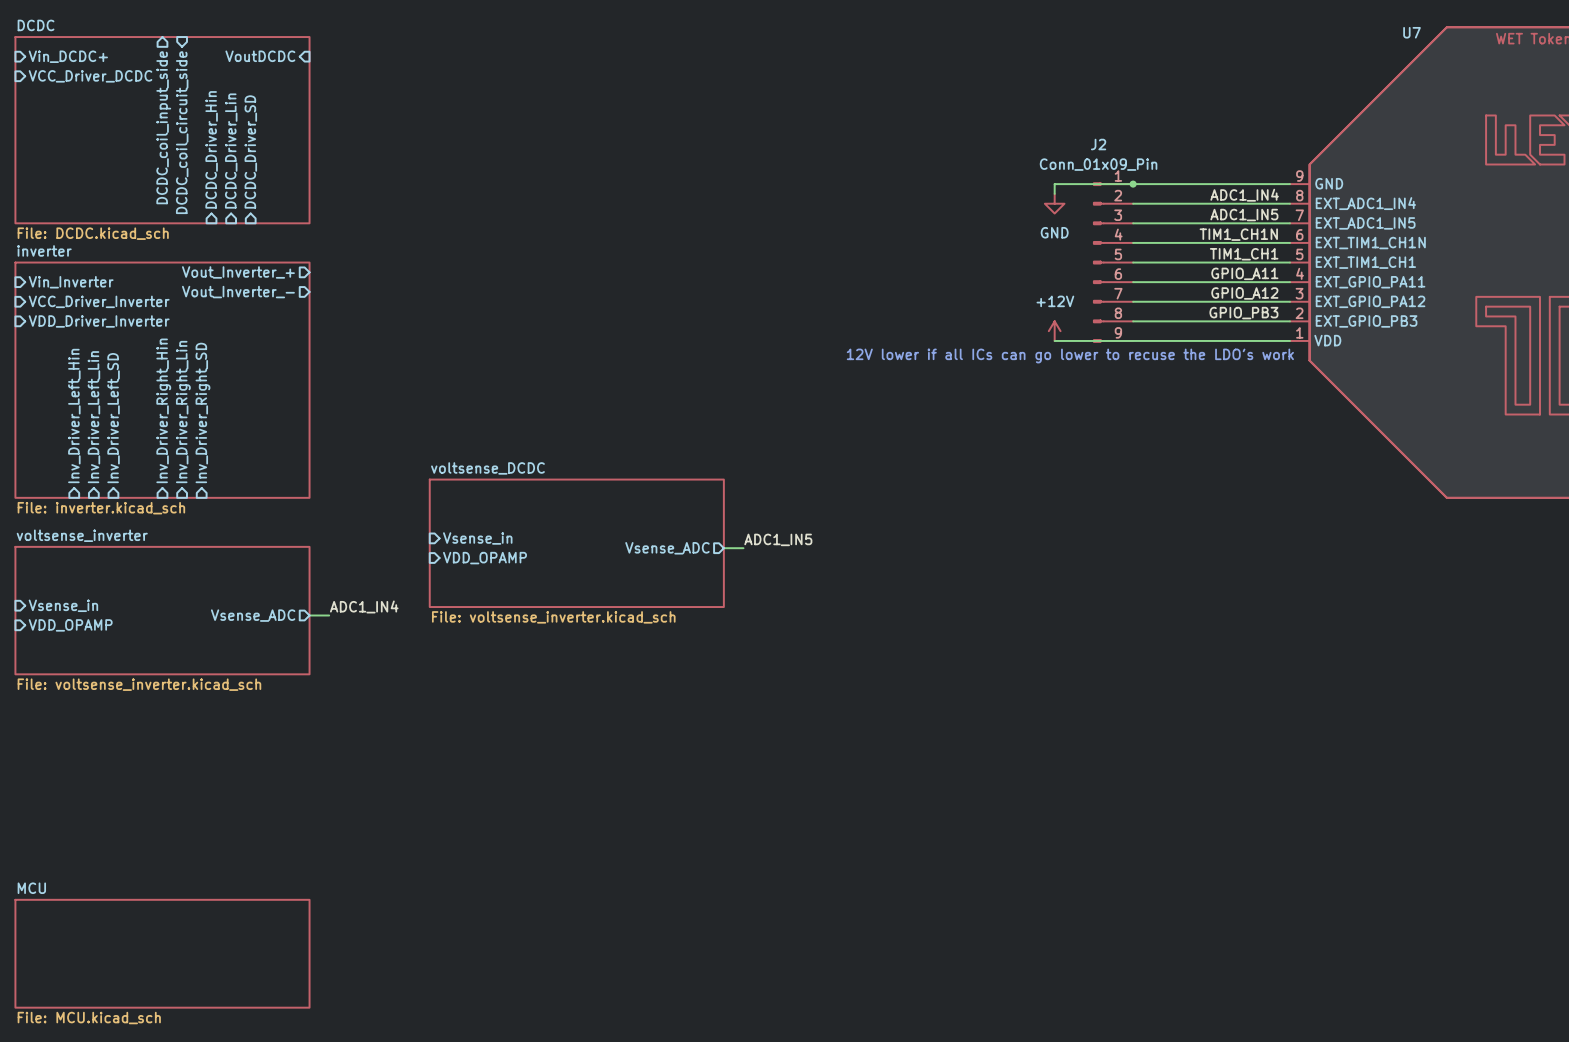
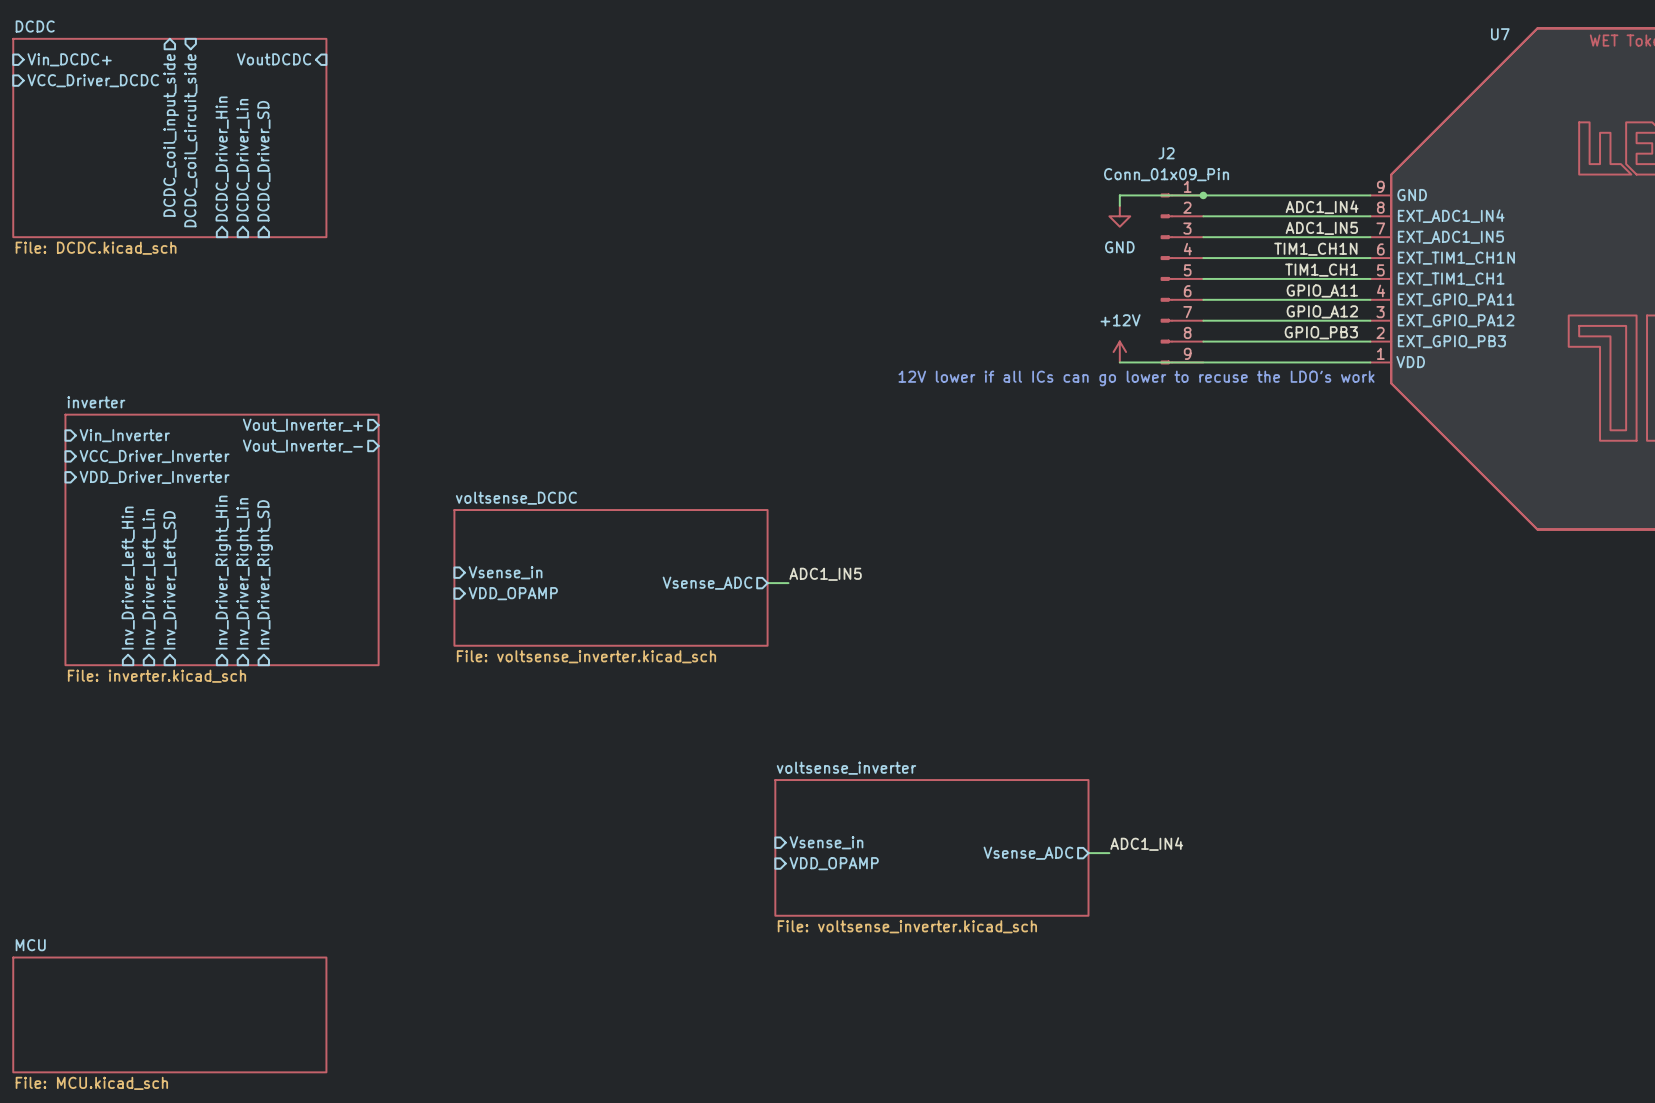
sheet pin position: Vout_Inverter_+ (238, 272) -> Vout_Inverter_+ (302, 425)
sheet pin position: Vin_Inverter (71, 282) -> Vin_Inverter (124, 435)
sheet pin position: Vout_Inverter_- (238, 292) -> Vout_Inverter_- (302, 446)
sheet pin position: VCC_Driver_Inverter (99, 301) -> VCC_Driver_Inverter (154, 456)
sheet pin position: VDD_Driver_Inverter (99, 321) -> VDD_Driver_Inverter (154, 477)
sheet inverter position: (162, 380) -> (222, 539)
sheet pin position: Inv_Driver_Right_Hin (163, 410) -> Inv_Driver_Right_Hin (223, 572)
sheet pin position: Inv_Driver_Right_Lin (183, 412) -> Inv_Driver_Right_Lin (244, 573)
sheet pin position: Inv_Driver_Right_SD (202, 412) -> Inv_Driver_Right_SD (265, 574)
sheet pin position: Inv_Driver_Left_Hin (74, 415) -> Inv_Driver_Left_Hin (128, 578)
sheet pin position: Inv_Driver_Left_Lin (93, 417) -> Inv_Driver_Left_Lin (149, 579)
sheet pin position: Inv_Driver_Left_SD (113, 418) -> Inv_Driver_Left_SD (169, 580)
sheet pin: Vsense_in (63, 605) -> none
label: ADC1_IN4 (364, 606) -> none
sheet voltsense_inverter: File: voltsense_inverter.kicad_sch (162, 610) -> none
sheet pin: Vsense_ADC (253, 615) -> none
wire: (309, 615) (329, 615) -> none
sheet pin: VDD_OPAMP (70, 625) -> none
sheet pin: none -> Vsense_in (826, 842)
label: none -> ADC1_IN4 (1146, 844)
sheet voltsense_inverter: none -> File: voltsense_inverter.kicad_sch (931, 847)
sheet pin: none -> Vsense_ADC (1028, 853)
wire: none -> (1088, 853) (1109, 853)
sheet pin: none -> VDD_OPAMP (834, 863)

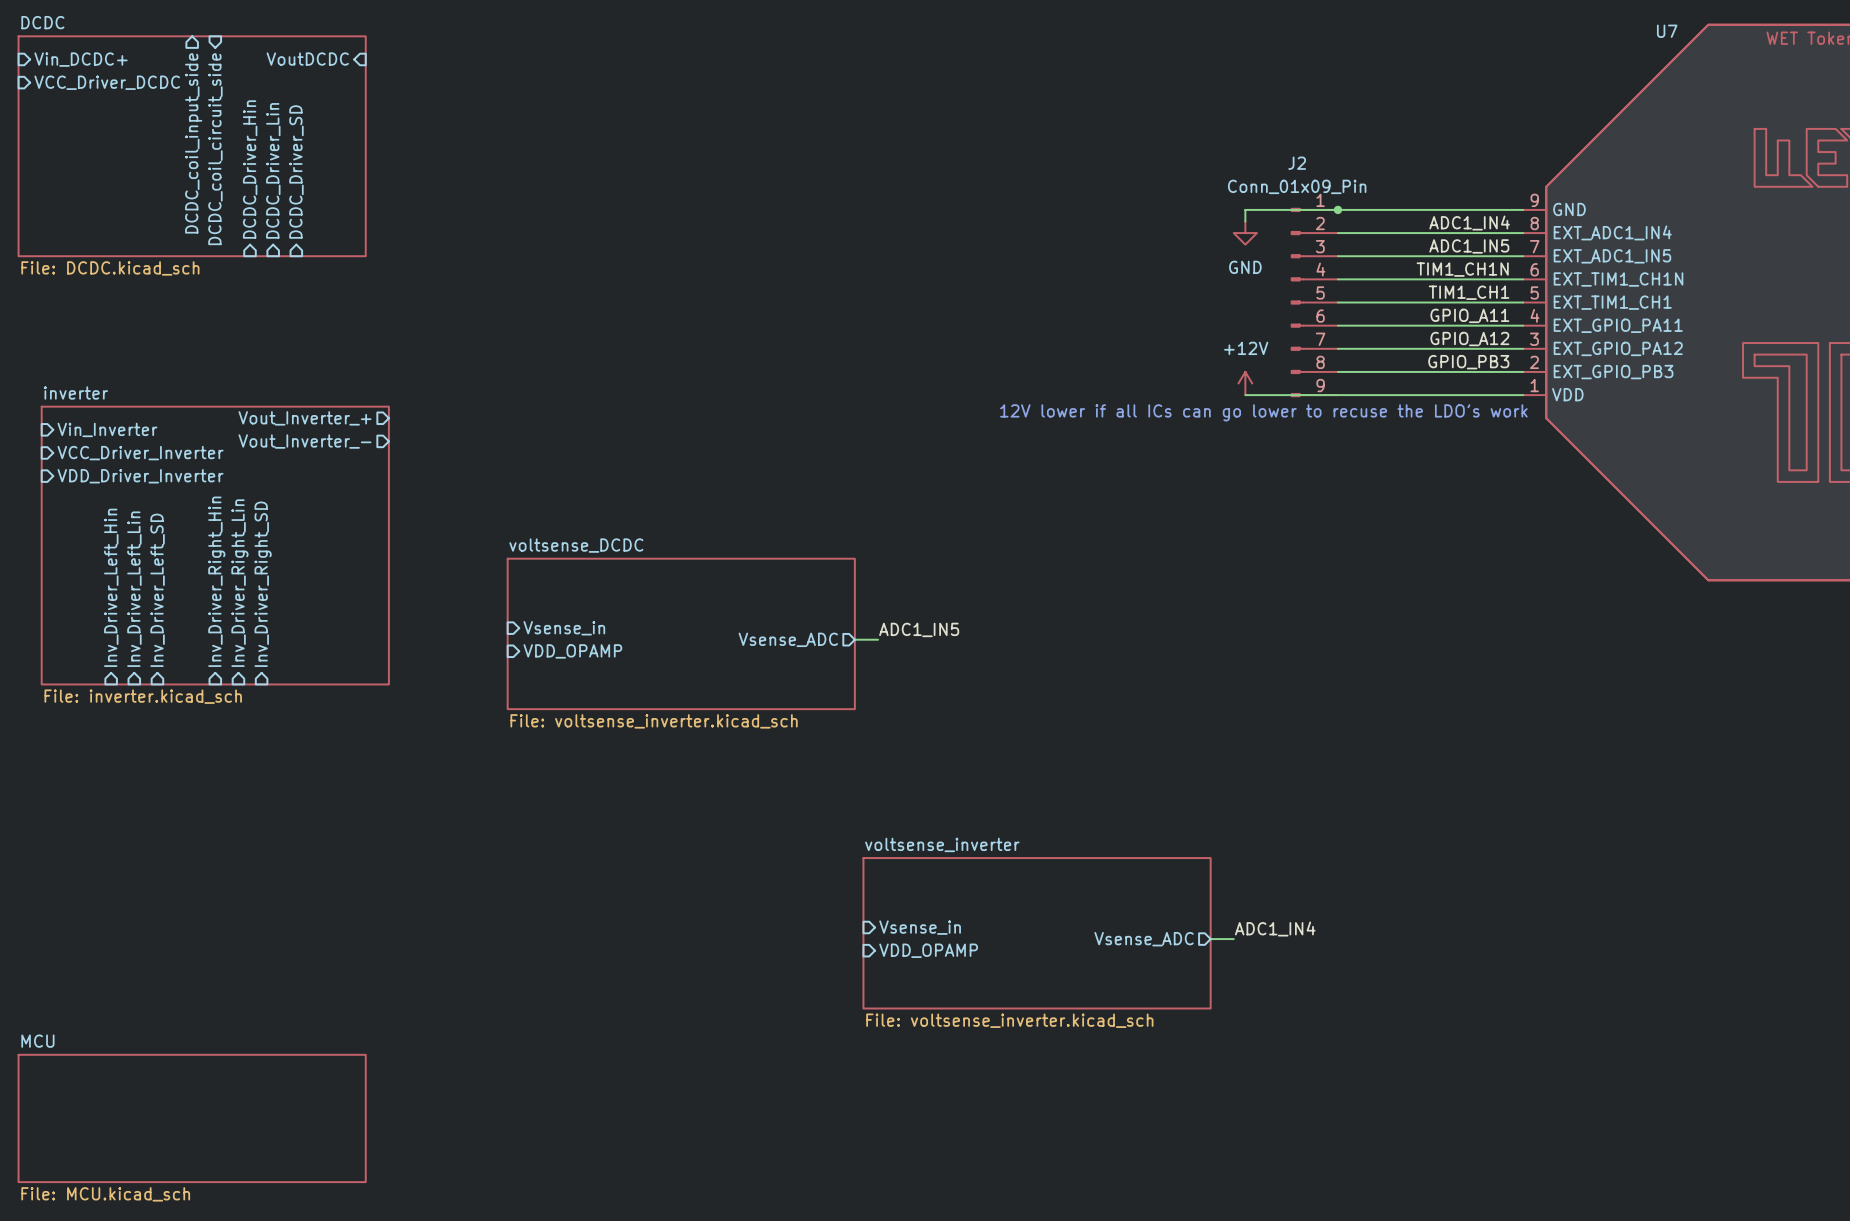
sheet pin position: Vout_Inverter_+ (302, 425) -> Vout_Inverter_+ (304, 418)
sheet pin position: Vin_Inverter (124, 435) -> Vin_Inverter (107, 429)
sheet pin position: Vout_Inverter_- (302, 446) -> Vout_Inverter_- (304, 441)
sheet pin position: VCC_Driver_Inverter (154, 456) -> VCC_Driver_Inverter (140, 453)
sheet pin position: VDD_Driver_Inverter (154, 477) -> VDD_Driver_Inverter (140, 476)
sheet inverter position: (222, 539) -> (215, 545)
sheet pin position: Inv_Driver_Right_Hin (223, 572) -> Inv_Driver_Right_Hin (216, 581)
sheet pin position: Inv_Driver_Right_Lin (244, 573) -> Inv_Driver_Right_Lin (239, 583)
sheet pin position: Inv_Driver_Right_SD (265, 574) -> Inv_Driver_Right_SD (263, 584)
sheet pin position: Inv_Driver_Left_Hin (128, 578) -> Inv_Driver_Left_Hin (111, 587)
sheet pin position: Inv_Driver_Left_Lin (149, 579) -> Inv_Driver_Left_Lin (134, 589)
sheet pin position: Inv_Driver_Left_SD (169, 580) -> Inv_Driver_Left_SD (157, 590)

